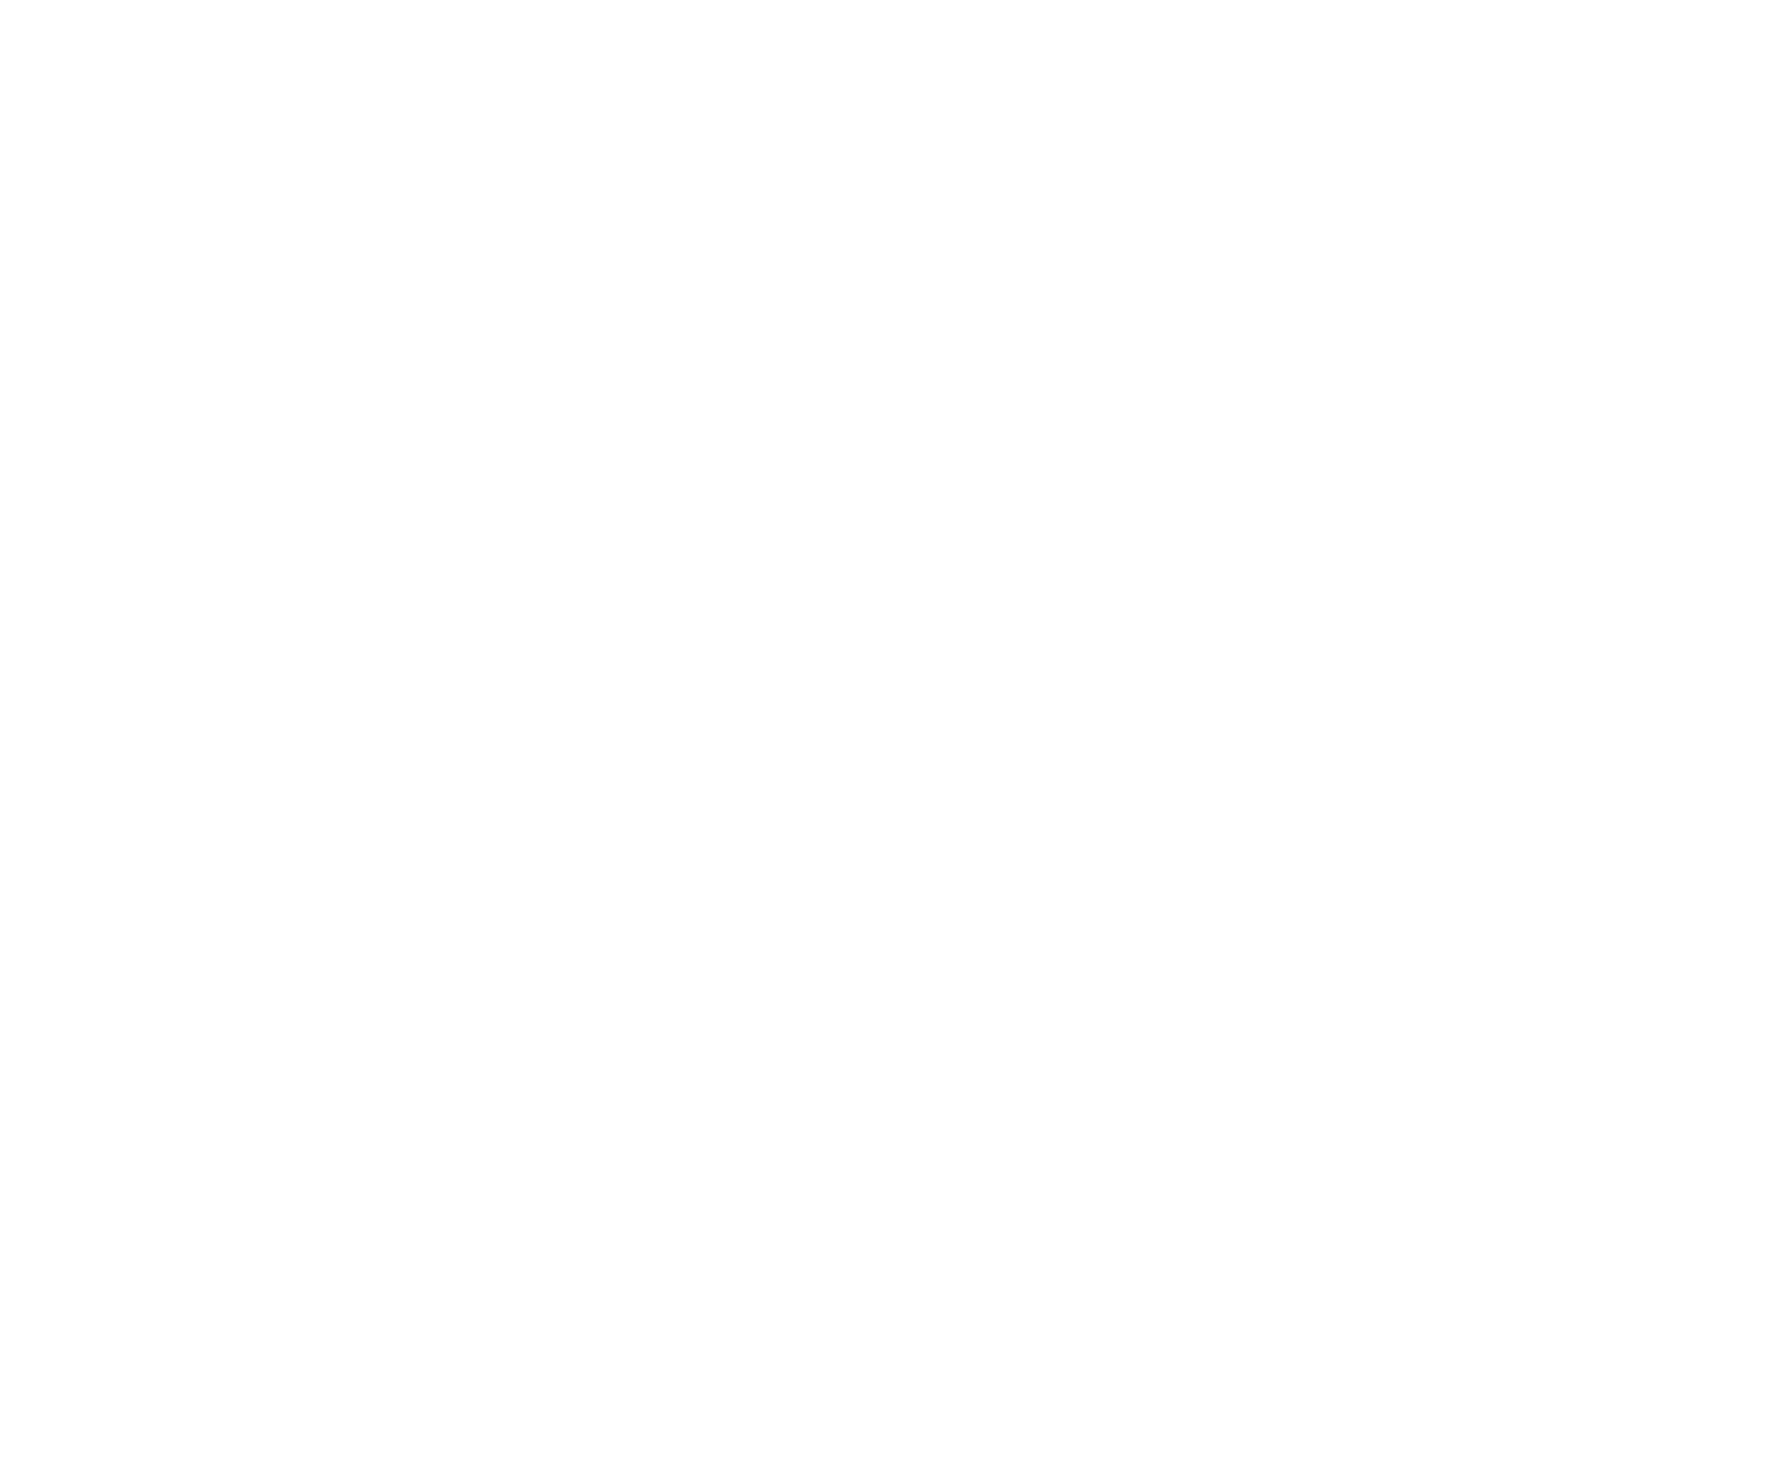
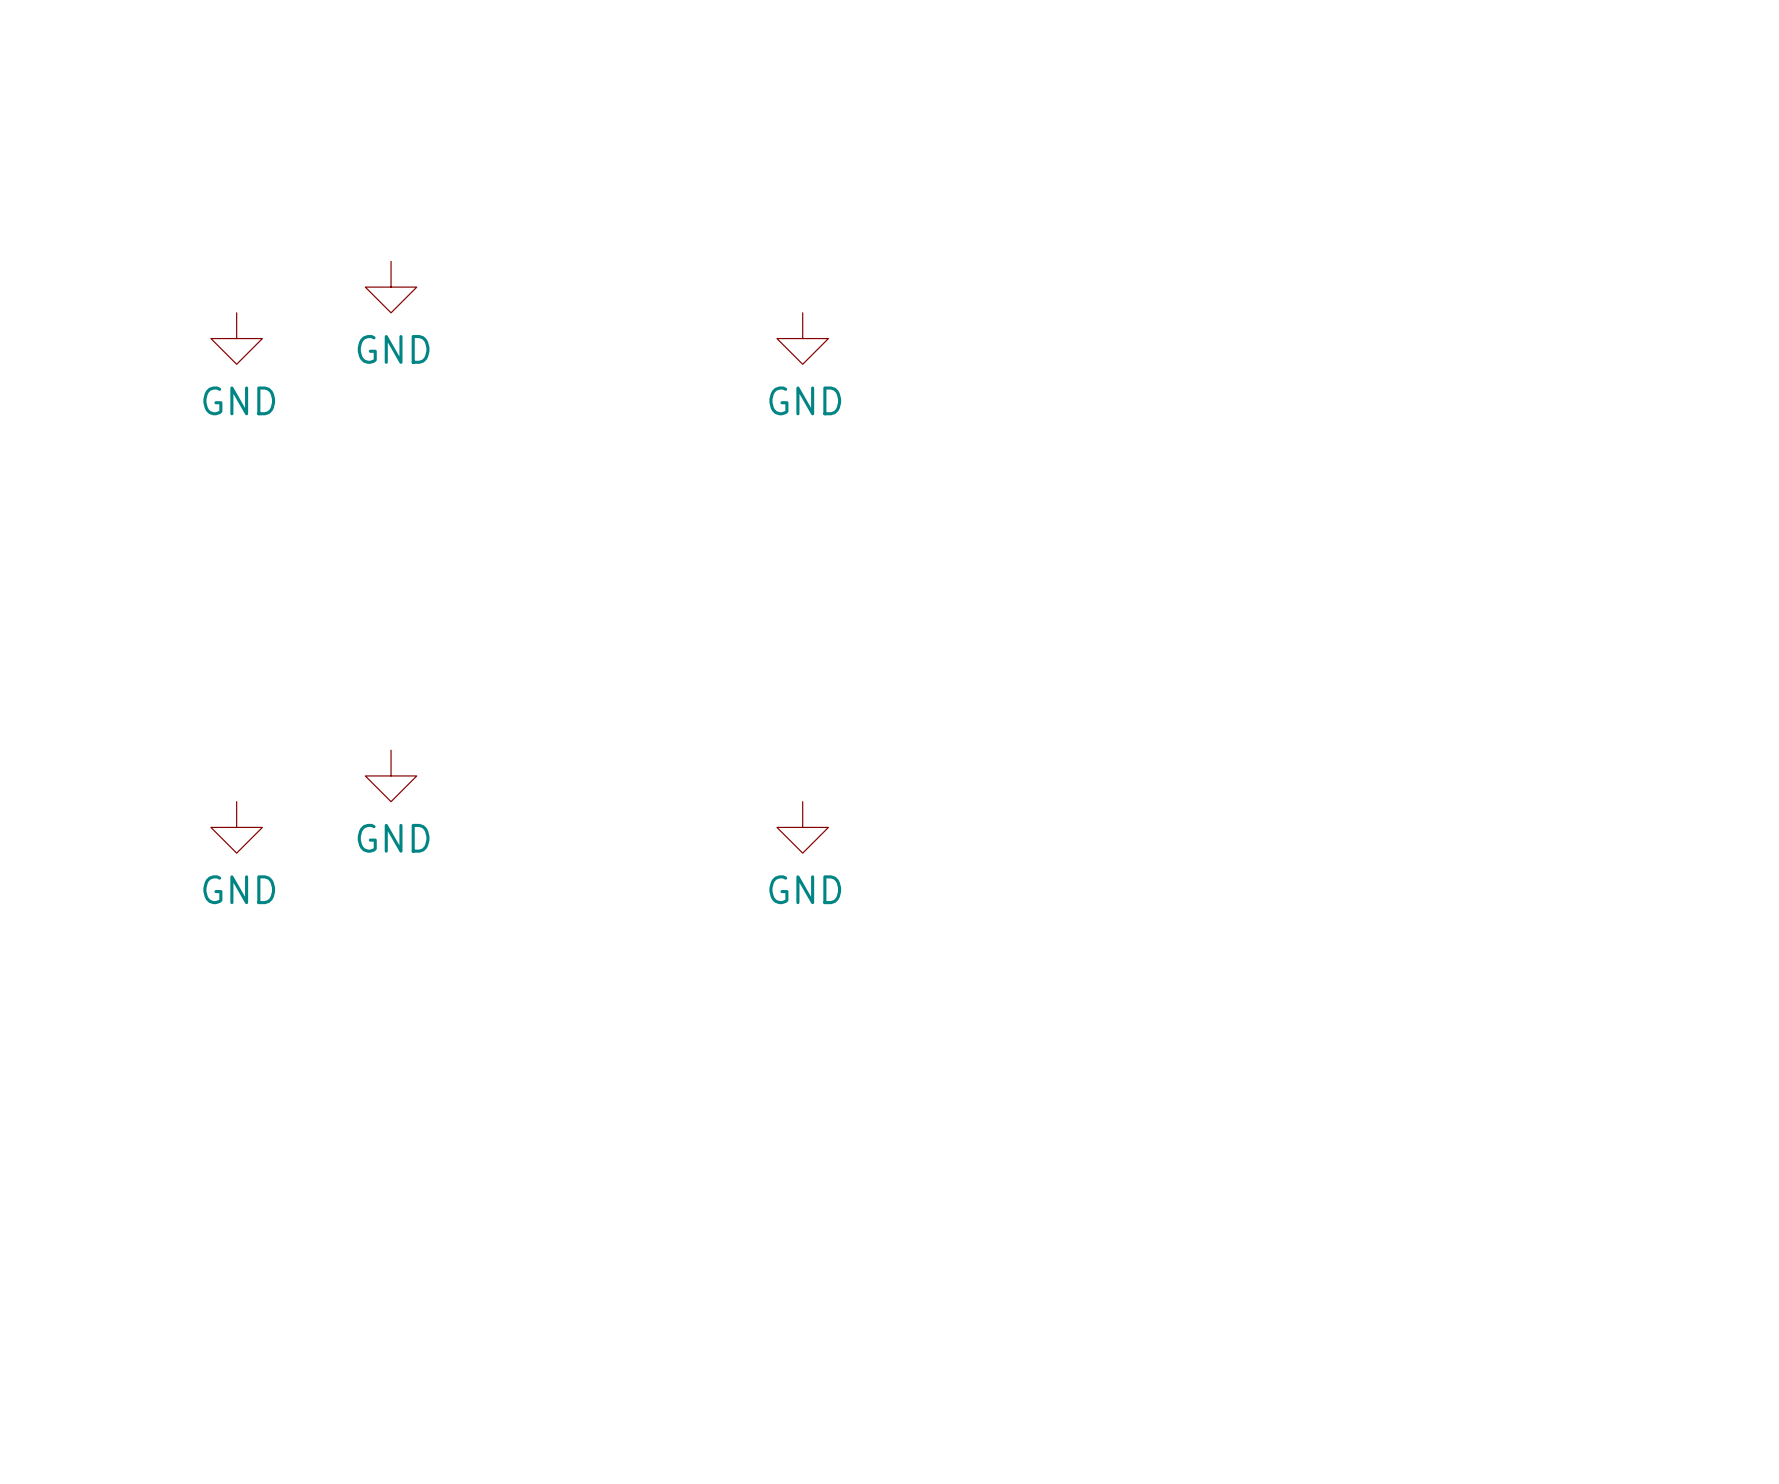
power symbol: none -> GND (391, 287)
power symbol: none -> GND (236, 338)
power symbol: none -> GND (802, 338)
power symbol: none -> GND (391, 775)
power symbol: none -> GND (236, 827)
power symbol: none -> GND (802, 827)

